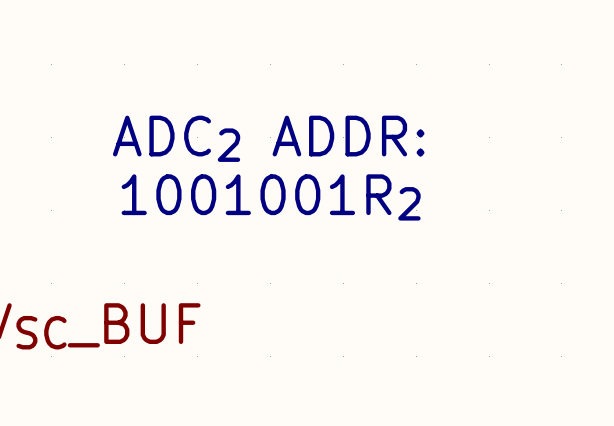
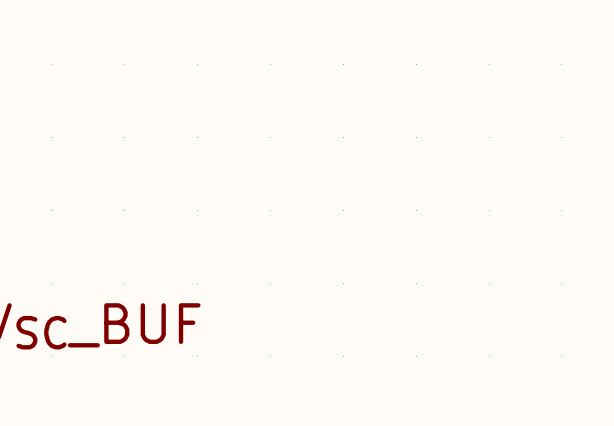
text: ADC2 ADDR: (268, 138) -> none
text: 1001001R2 (271, 197) -> none

